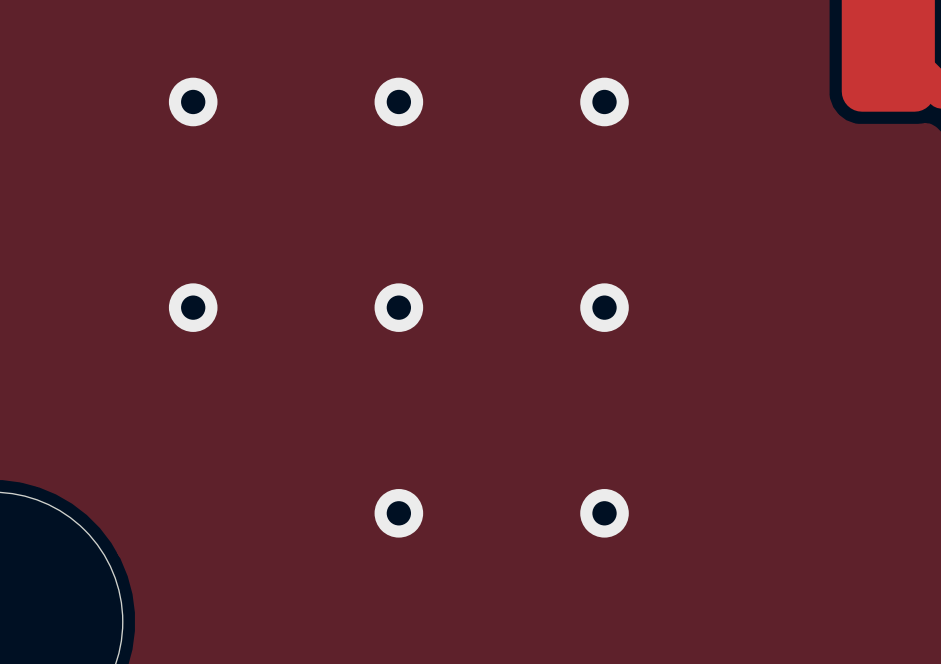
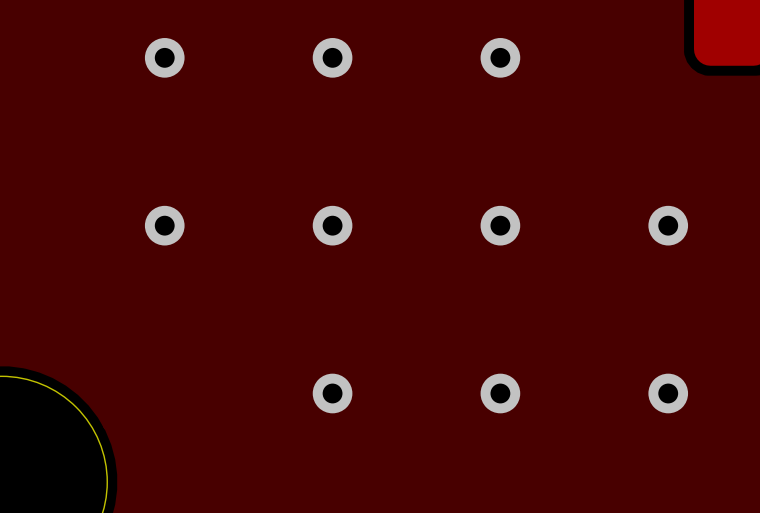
via: none -> (668, 225)
via: none -> (668, 393)

